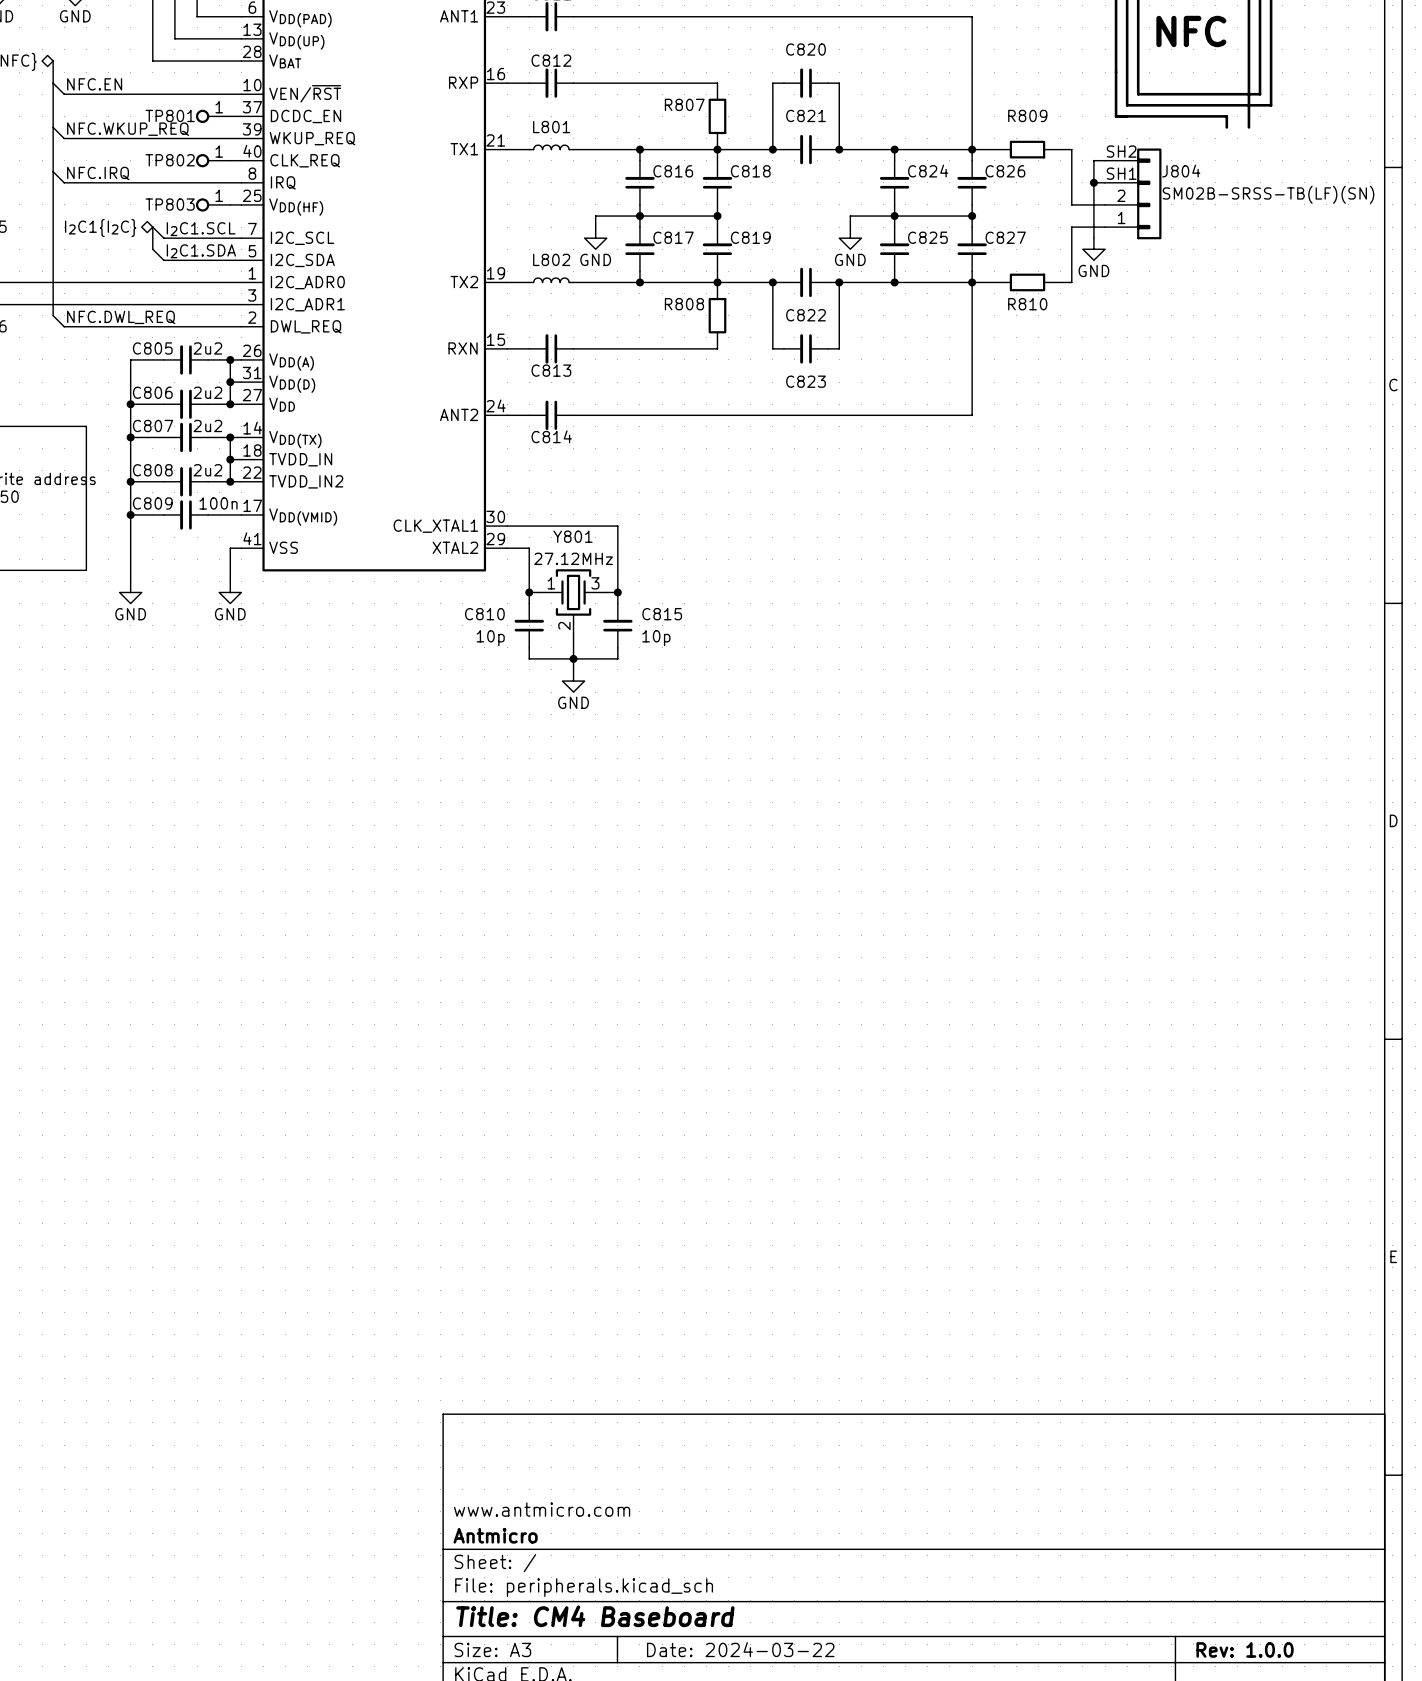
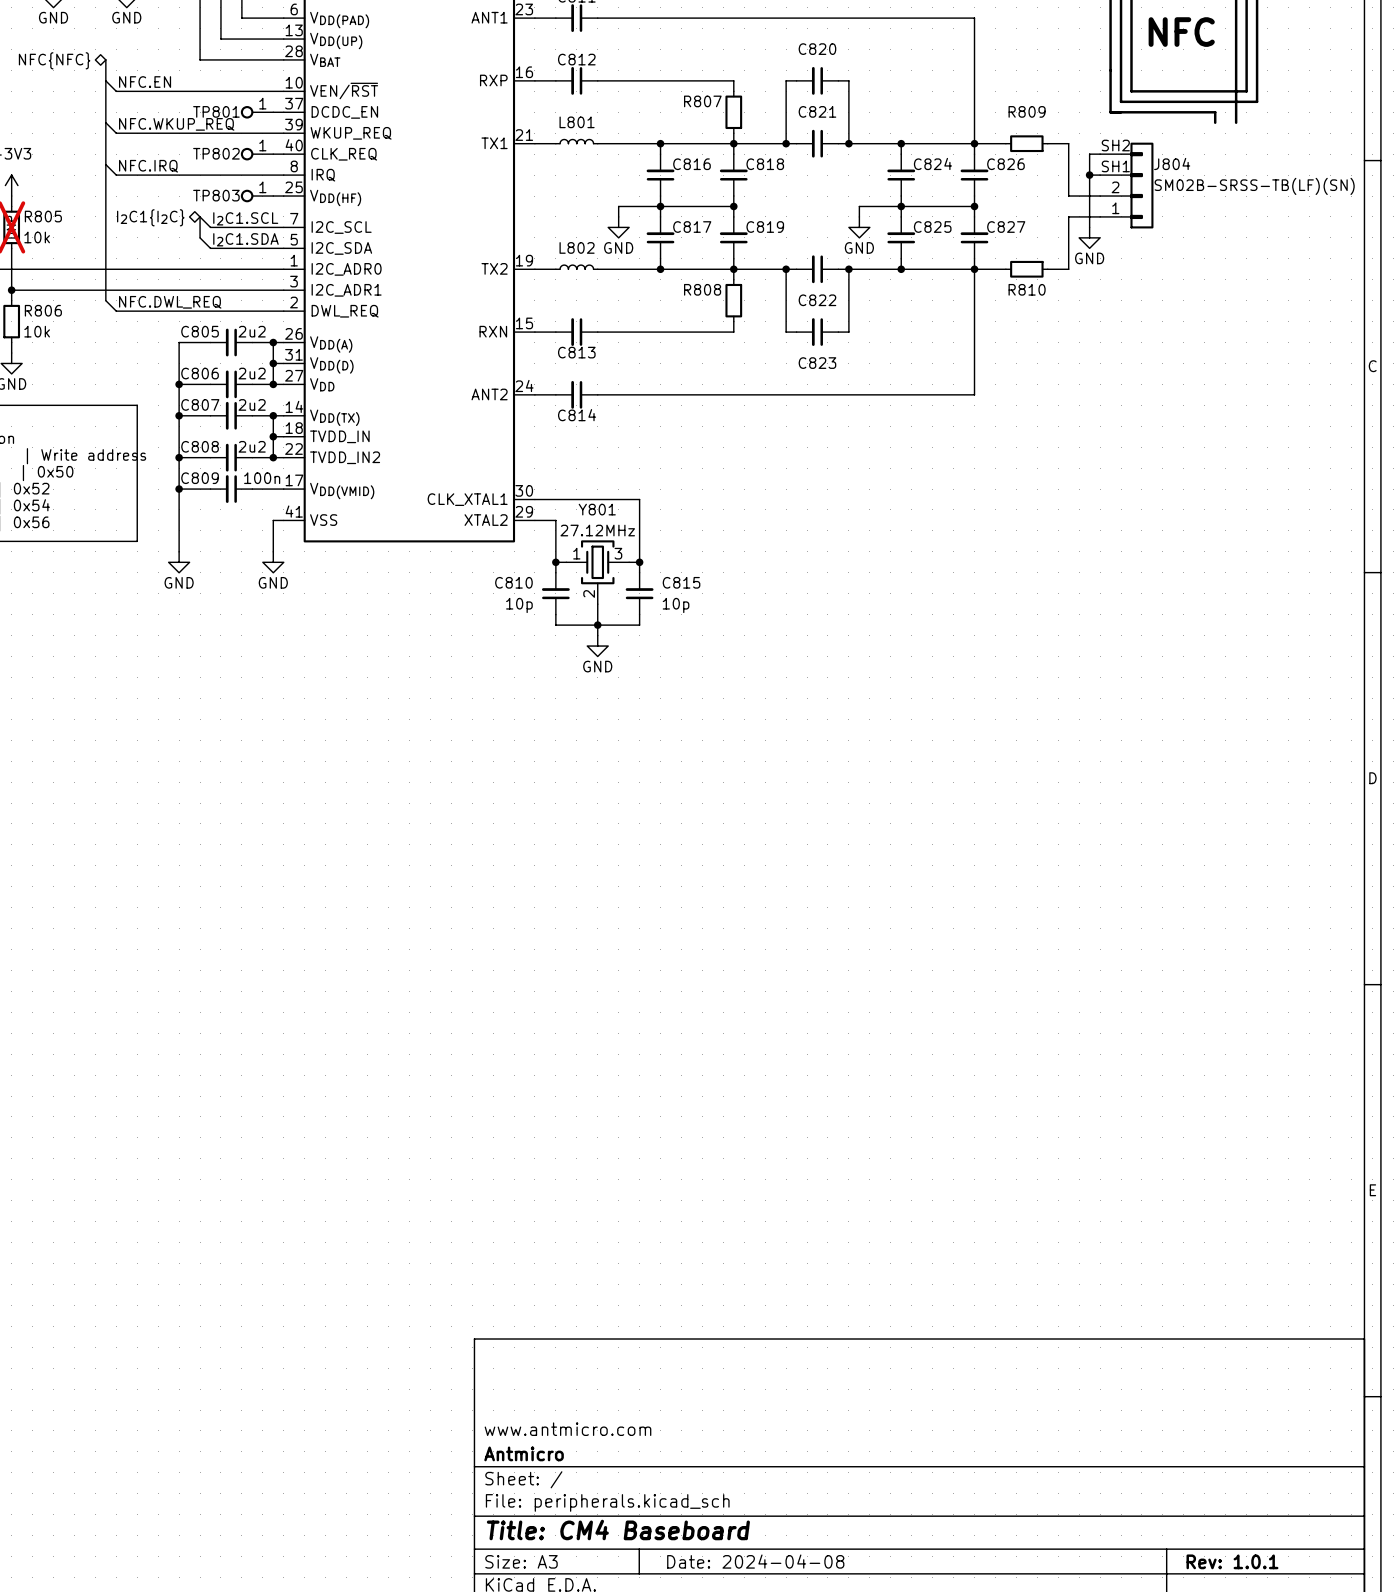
title block: Date: 2024-03-22 (740, 1649) -> Date: 2024-04-08 (755, 1561)
title block: Rev: 1.0.0 (1245, 1649) -> Rev: 1.0.1 (1232, 1561)

